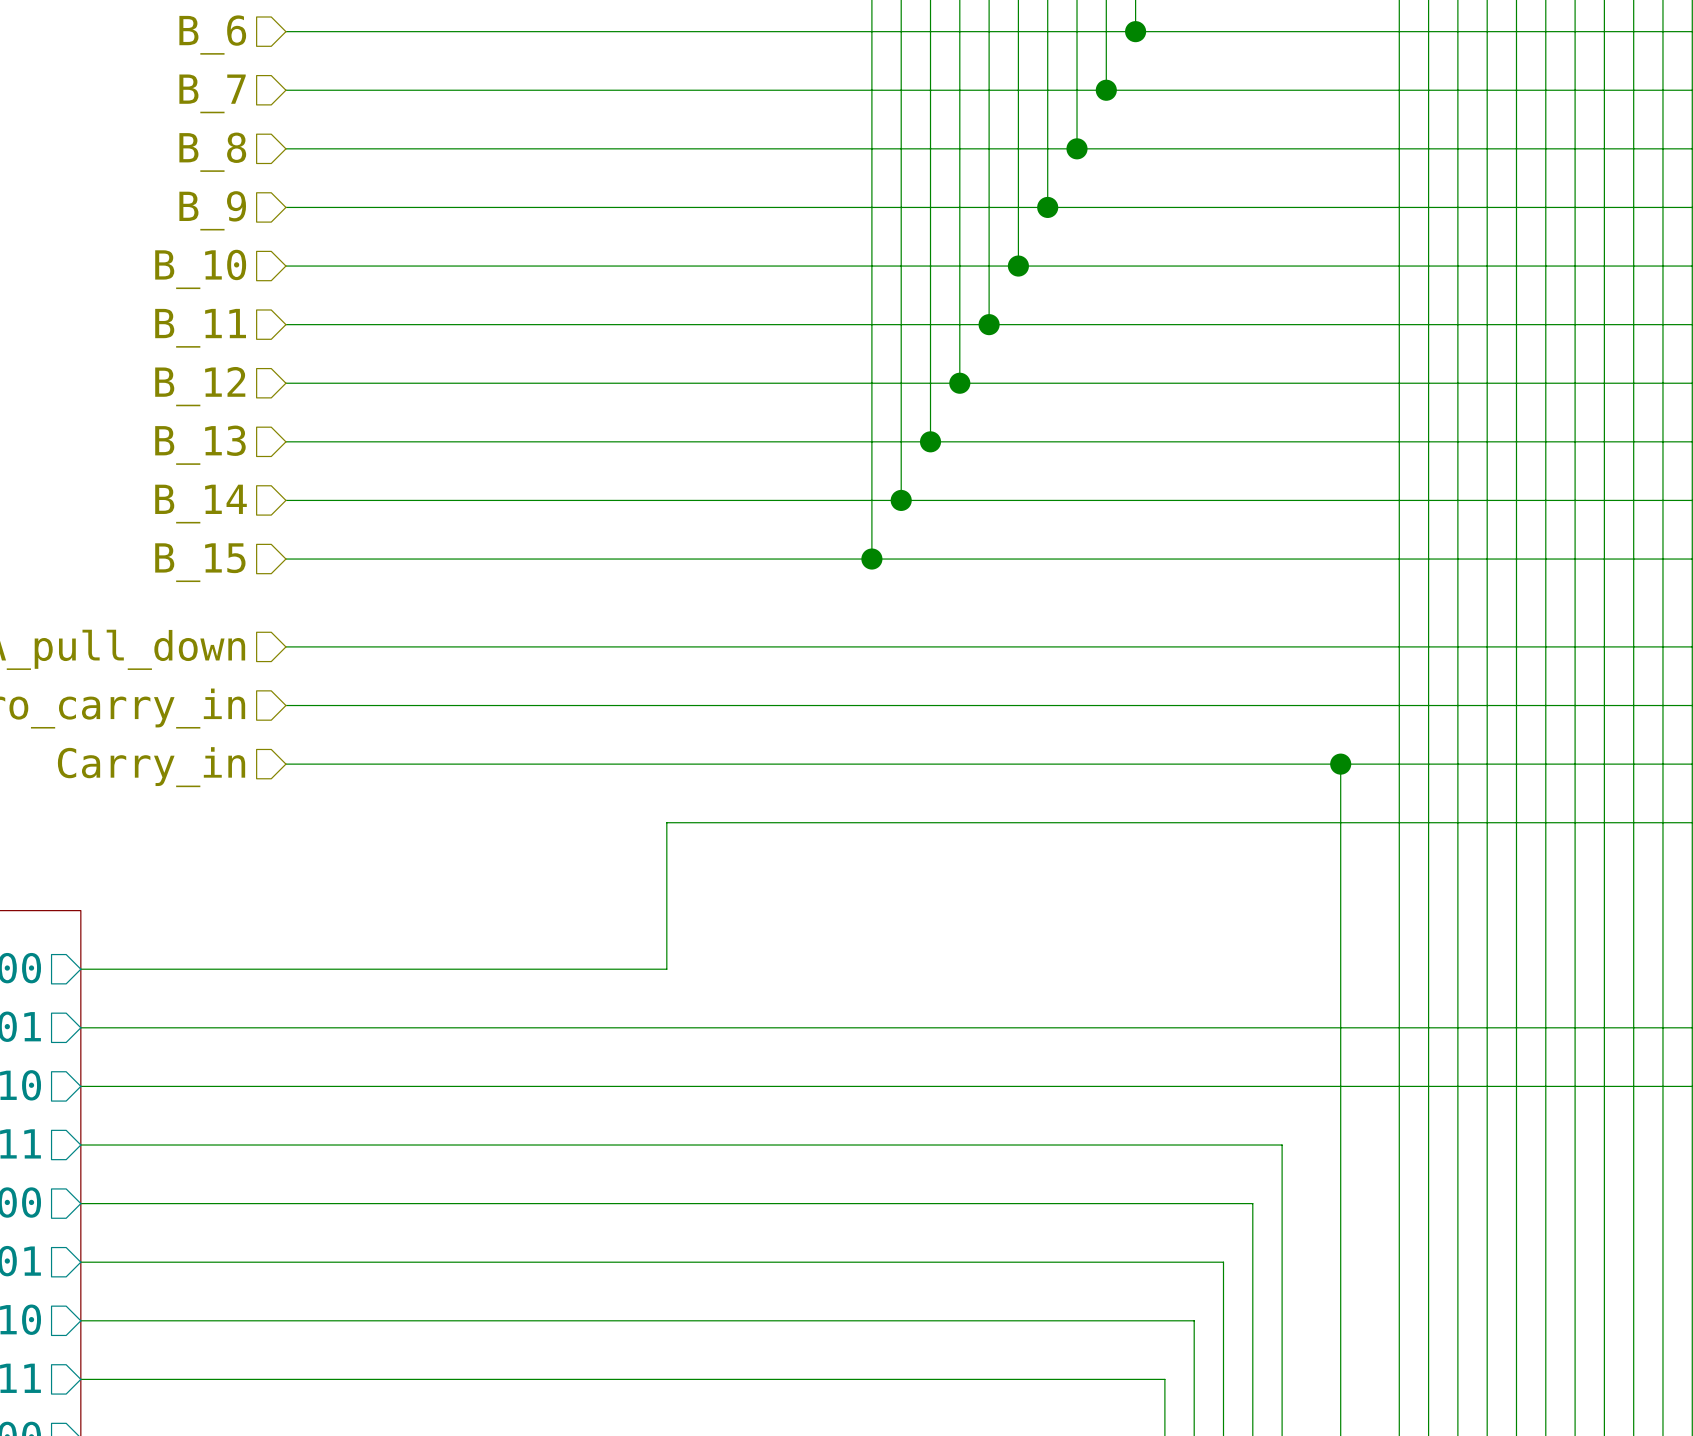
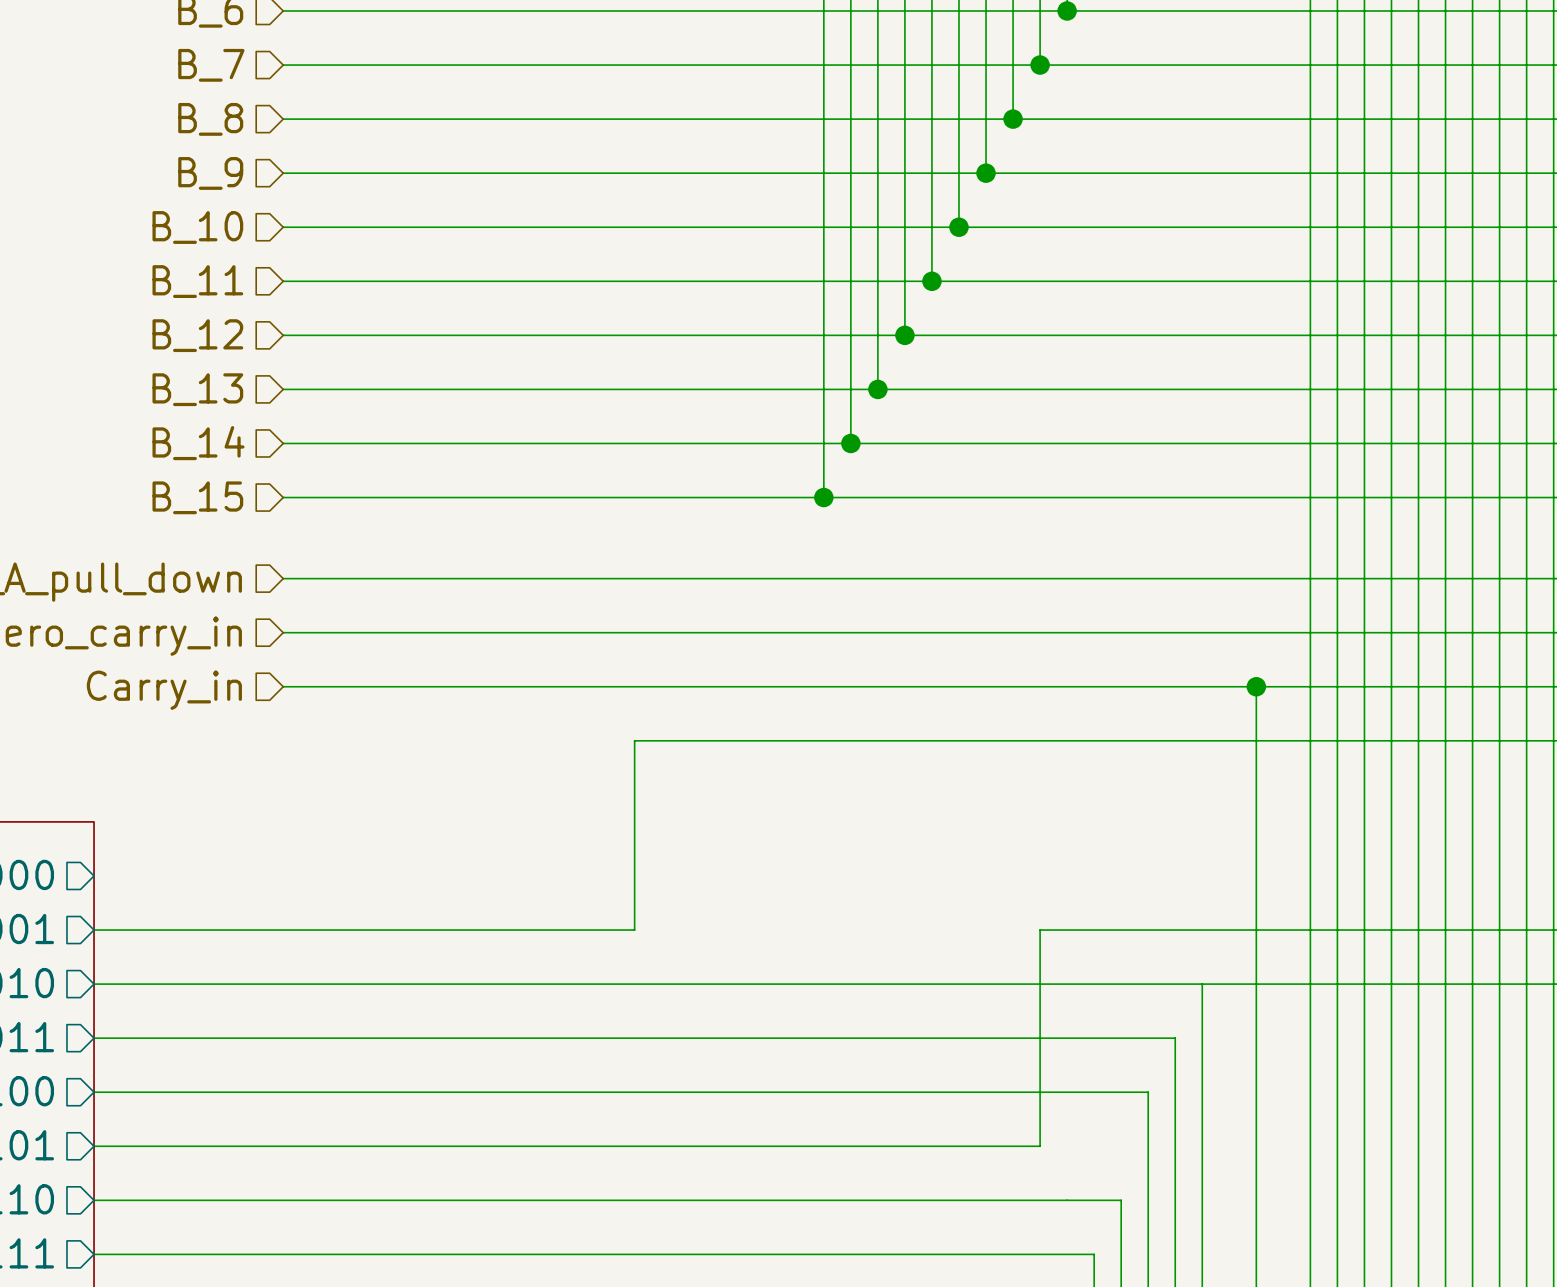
wire: (80, 969) (666, 969) -> none
wire: (666, 1027) (1106, 1027) -> (634, 930) (634, 875)
wire: none -> (1202, 984) (1202, 1038)
wire: (1252, 1145) (1282, 1145) -> (1175, 1038) (1175, 1092)
wire: (1223, 1203) (1252, 1203) -> (1148, 1092) (1148, 1146)
wire: (1106, 1262) (1223, 1262) -> (1040, 1146) (1040, 930)

